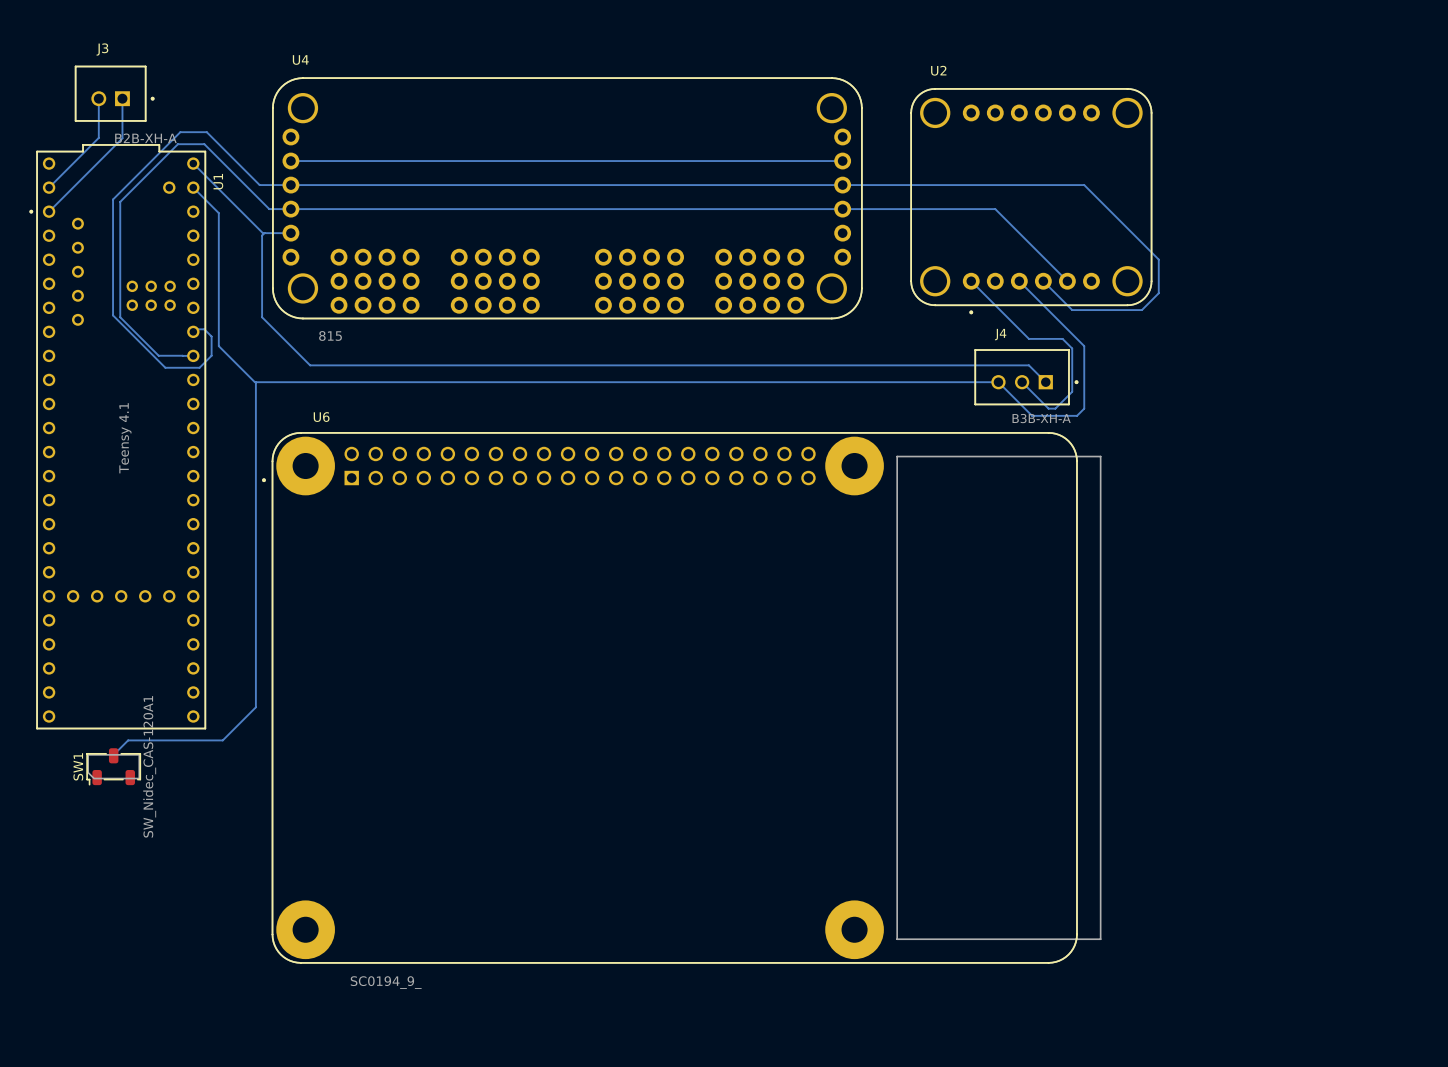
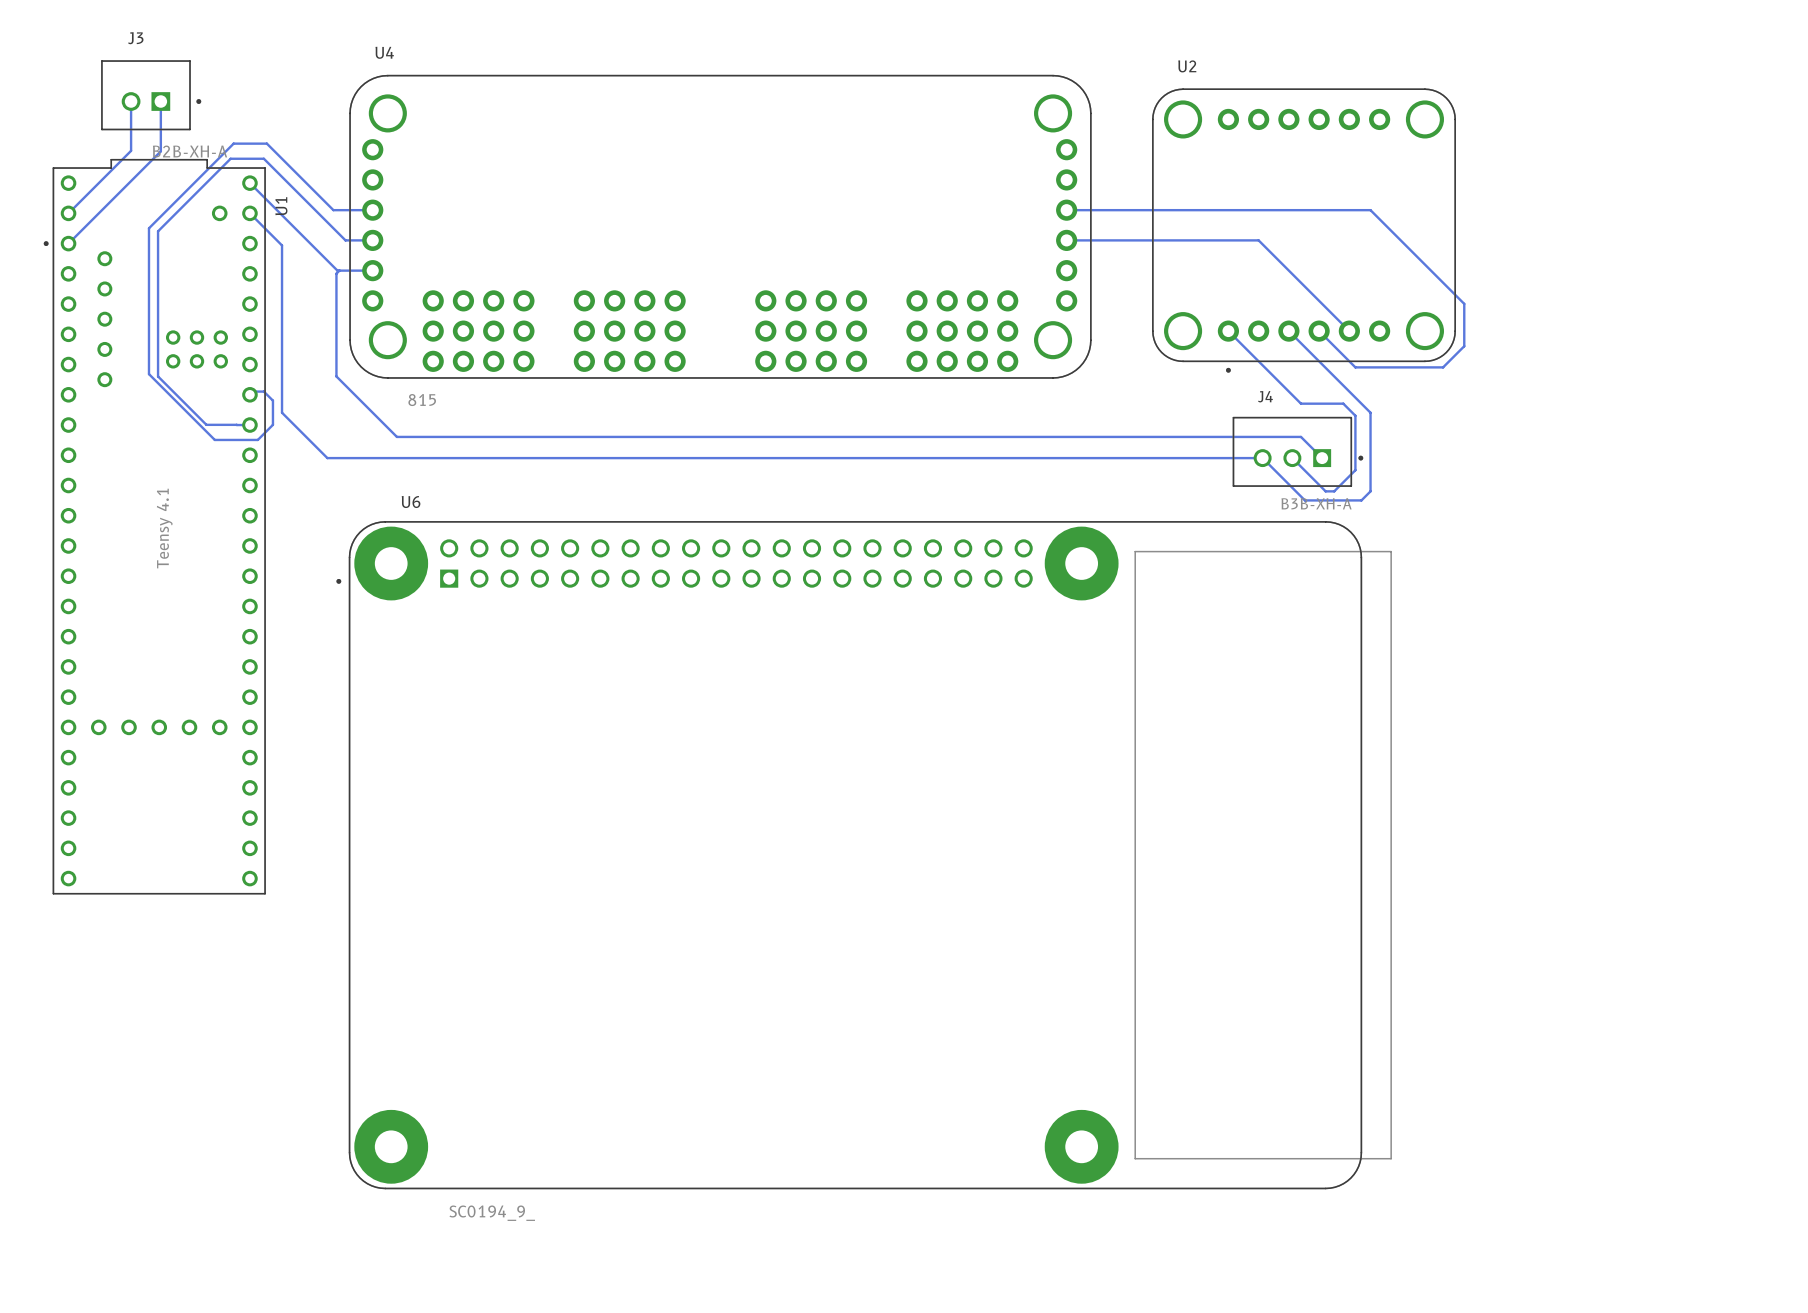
bottom track: (290, 161) (842, 161) -> none
bottom track: (290, 185) (842, 185) -> none
bottom track: (290, 209) (842, 209) -> none
bottom track: (255, 382) (255, 707) (222, 740) (128, 740) (113, 754) -> none
SW1: SW_Nidec_CAS-120A1 (113, 766) -> none

